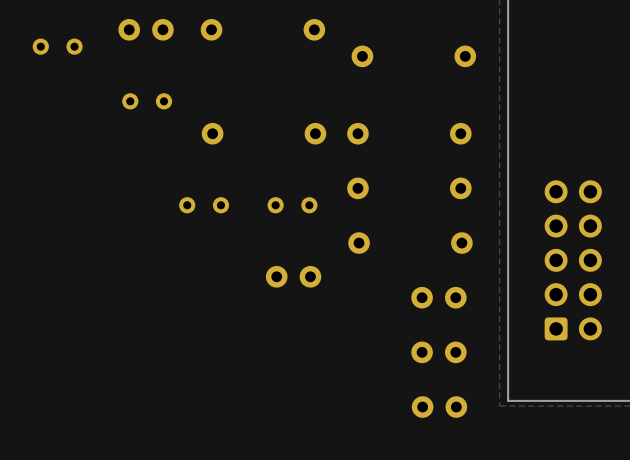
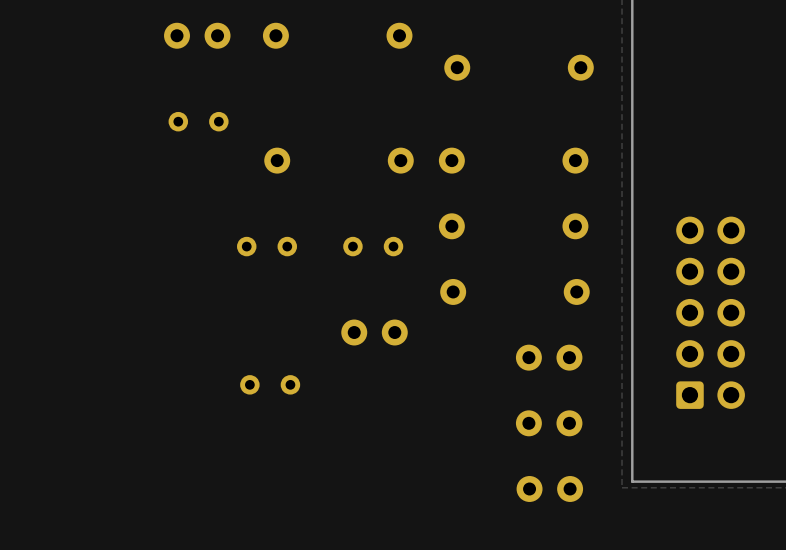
part position: (57, 46) -> (270, 384)

